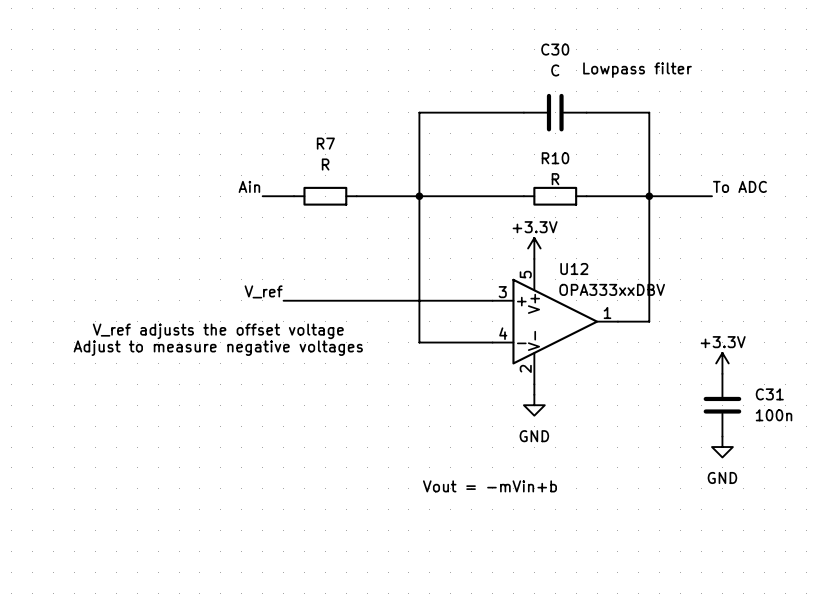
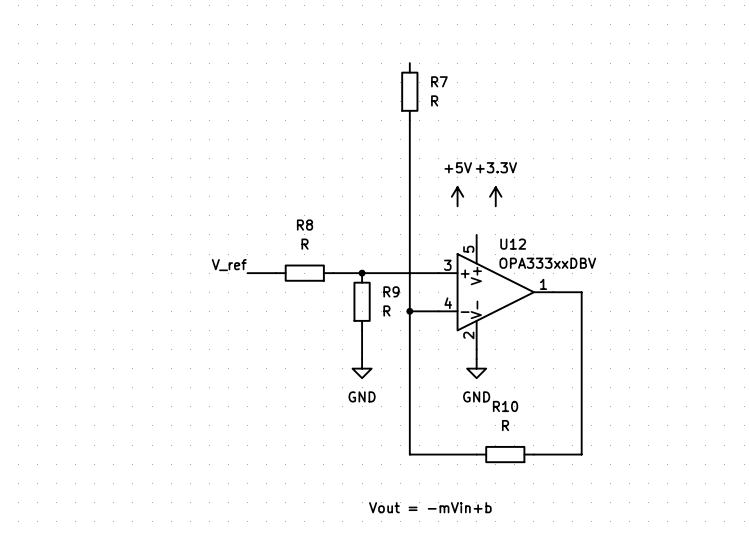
text: Lowpass filter (637, 70) -> none
wire: (523, 112) (419, 112) (419, 342) (461, 342) -> none
C30: C (555, 112) -> none
wire: (586, 112) (649, 112) (649, 321) -> (533, 454) (581, 454) (581, 292)
wire: none -> (409, 120) (409, 454) (476, 454)
R7 name position: R7 (325, 143) -> R7 (439, 81)
R10 name position: R10 (555, 158) -> R10 (505, 406)
R10 value position: R (555, 179) -> R (505, 425)
label: Ain (249, 186) -> none
label: To ADC (739, 186) -> none
wire: (262, 196) (294, 196) -> none
R7 rotation: 0° (325, 196) -> 90° clockwise (409, 91)
R7 position: (325, 196) -> (409, 91)
wire: (356, 196) (523, 196) -> none
junction: (419, 196) -> none
R10 position: (555, 196) -> (505, 454)
wire: (586, 196) (711, 196) -> none
junction: (649, 196) -> none
power symbol: none -> +5V (457, 196)
power symbol text position: +3.3V (535, 227) -> +3.3V (496, 167)
power symbol position: +3.3V (534, 248) -> +3.3V (495, 196)
wire: (314, 300) (377, 300) -> none
R8: none -> R (304, 273)
junction: none -> (362, 273)
text: V_ref adjusts the offset voltage (218, 331) -> none
R9: none -> R (362, 301)
junction: none -> (409, 311)
text: Adjust to measure negative voltages (218, 348) -> none
wire: none -> (362, 330) (362, 359)
power symbol: +3.3V (722, 363) -> none
power symbol: none -> GND (362, 368)
C31: 100n (722, 405) -> none
power symbol: GND (722, 447) -> none
text position: Vout = -mVin+b (489, 486) -> Vout = -mVin+b (430, 507)

